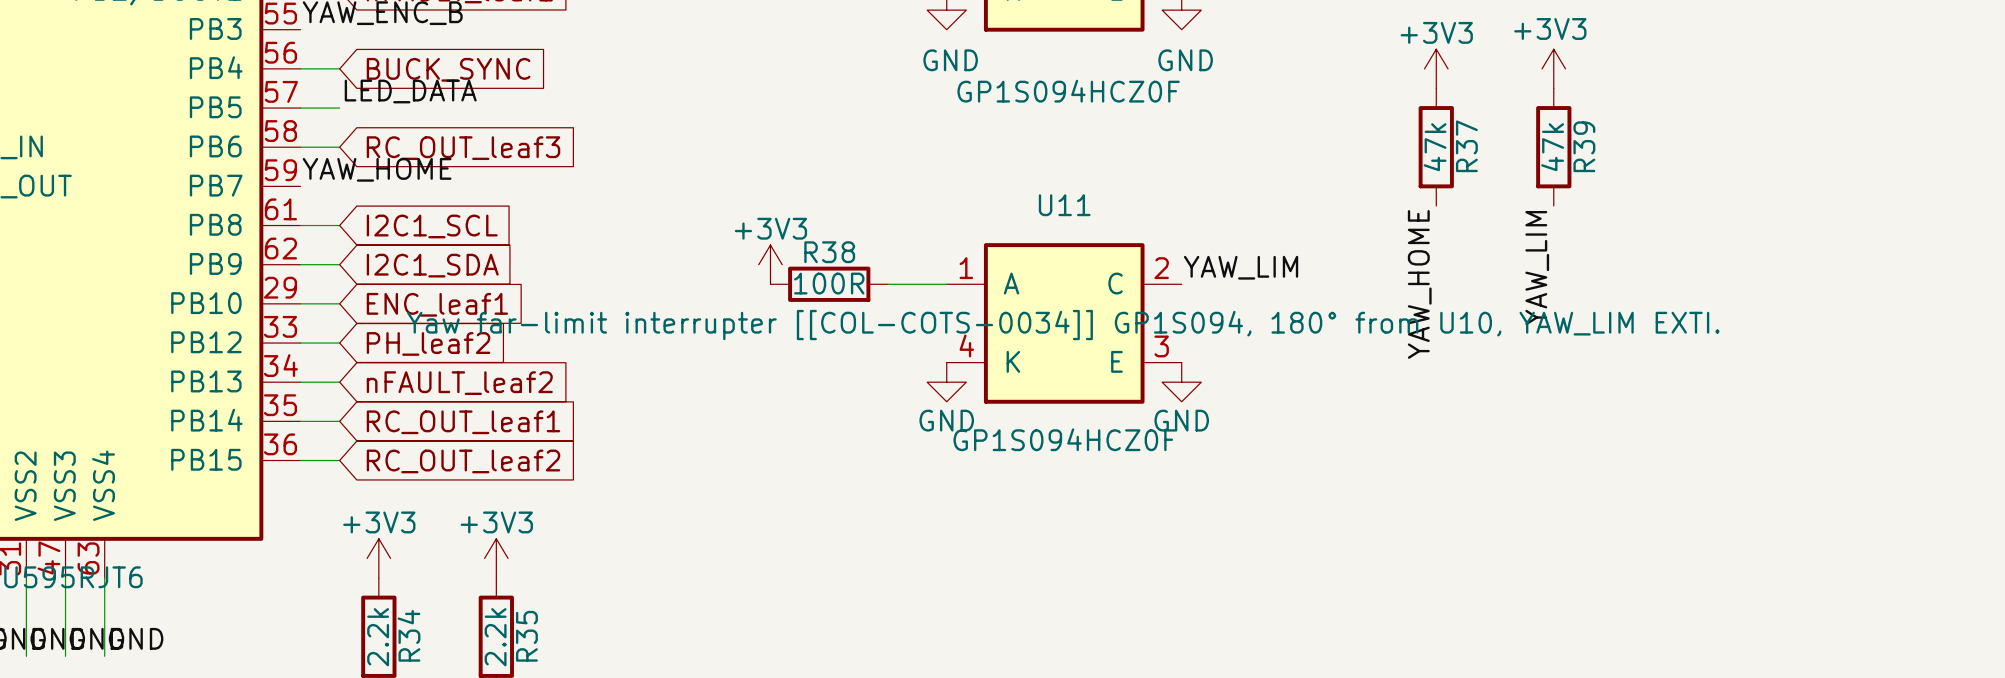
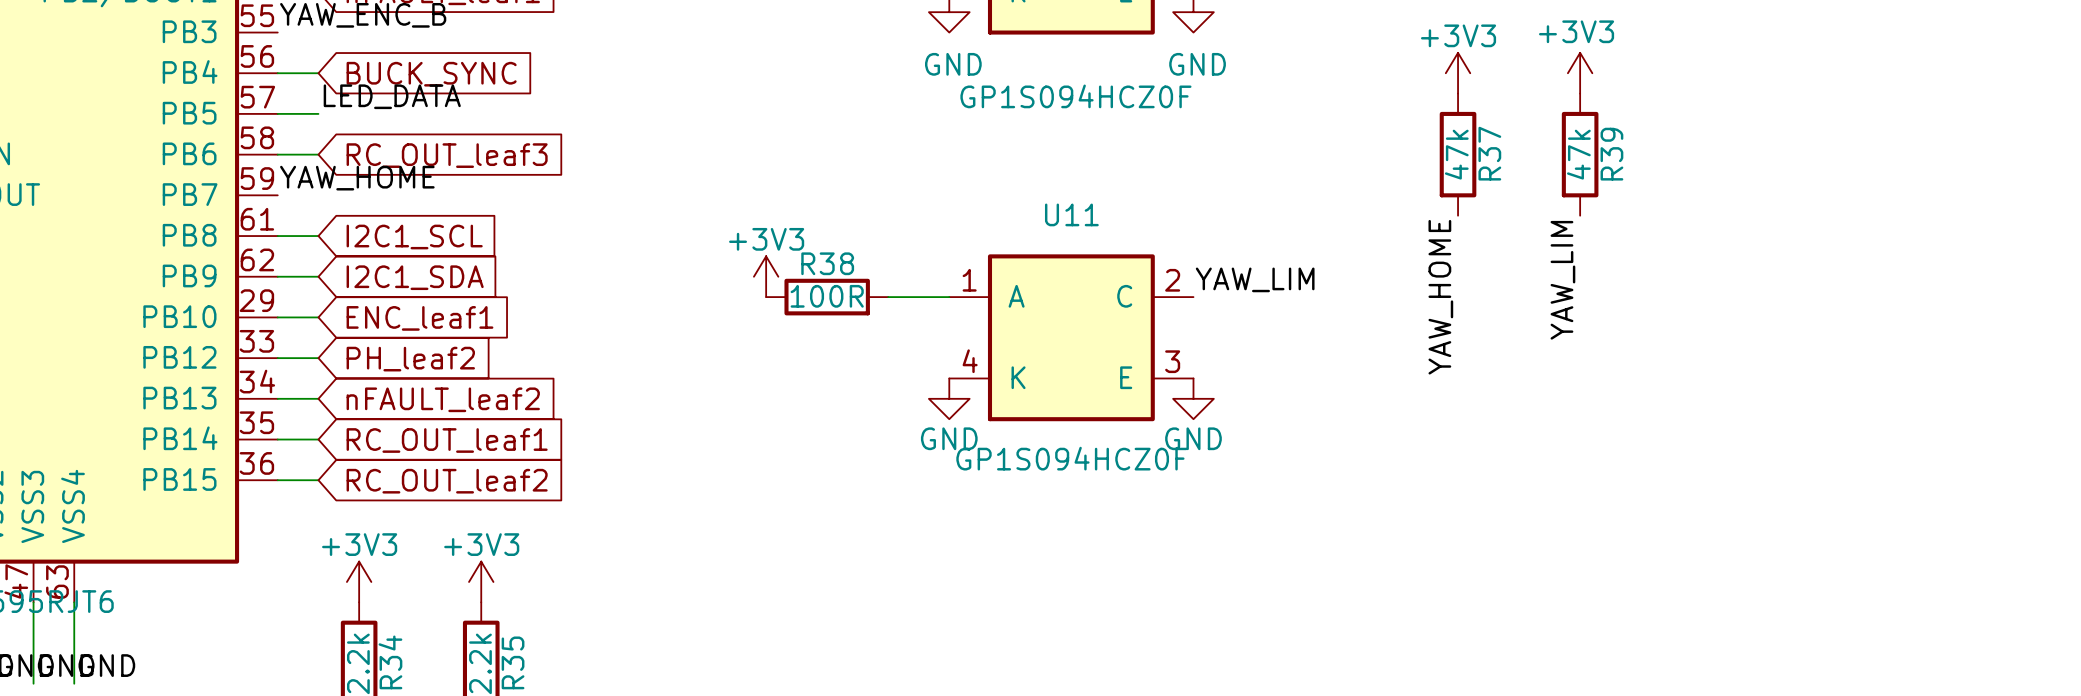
U11 text: Yaw far-limit interrupter [[COL-COTS-0034]] GP1S094, 180° from U10, YAW_LIM EXTI. (1063, 325) -> none

